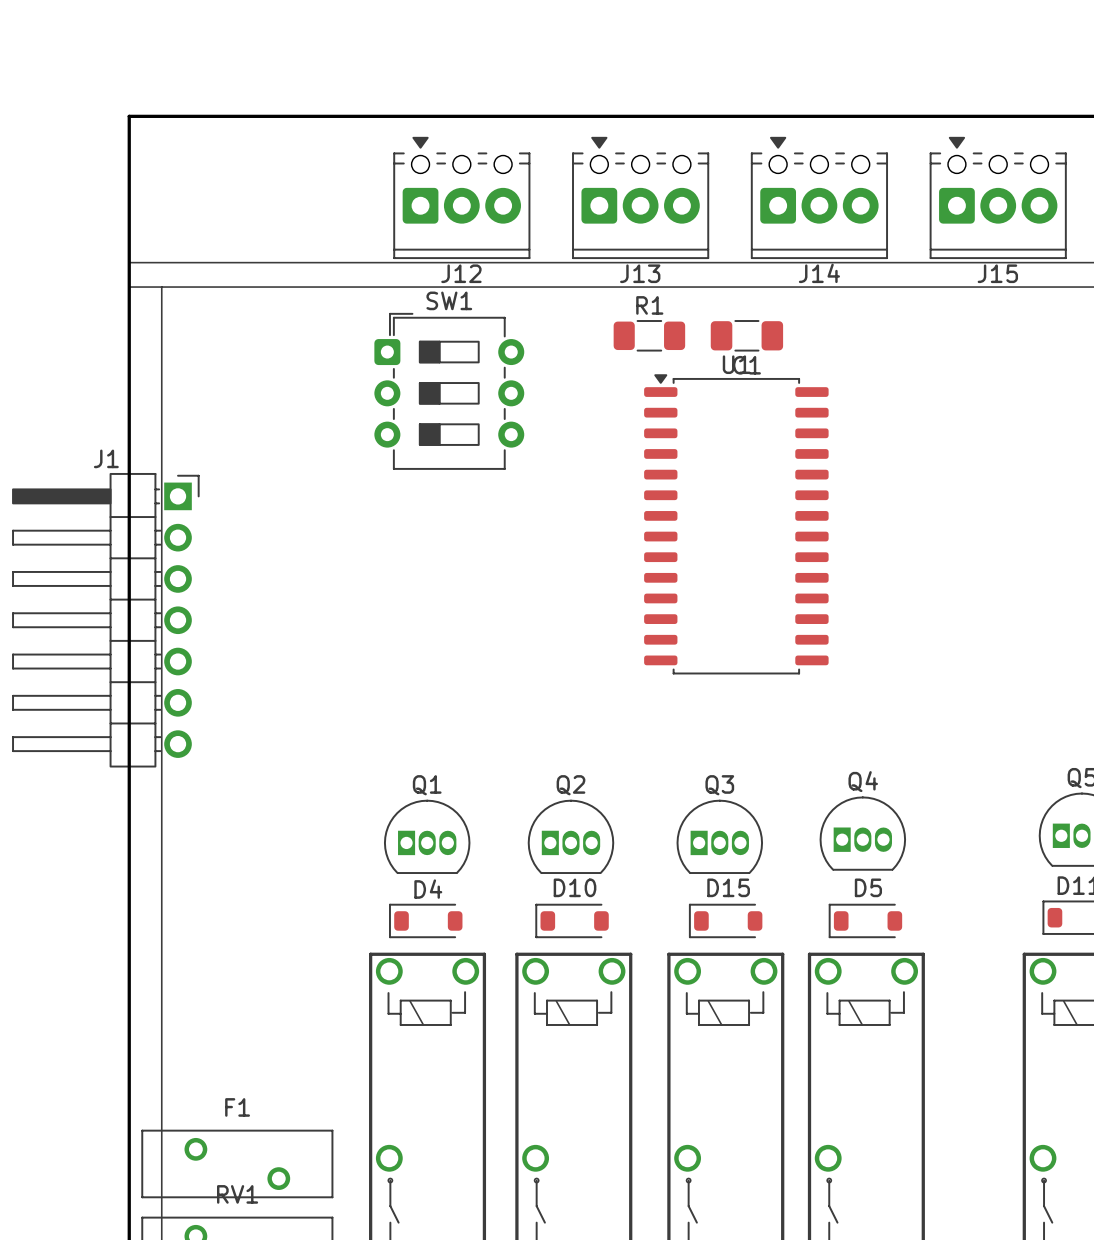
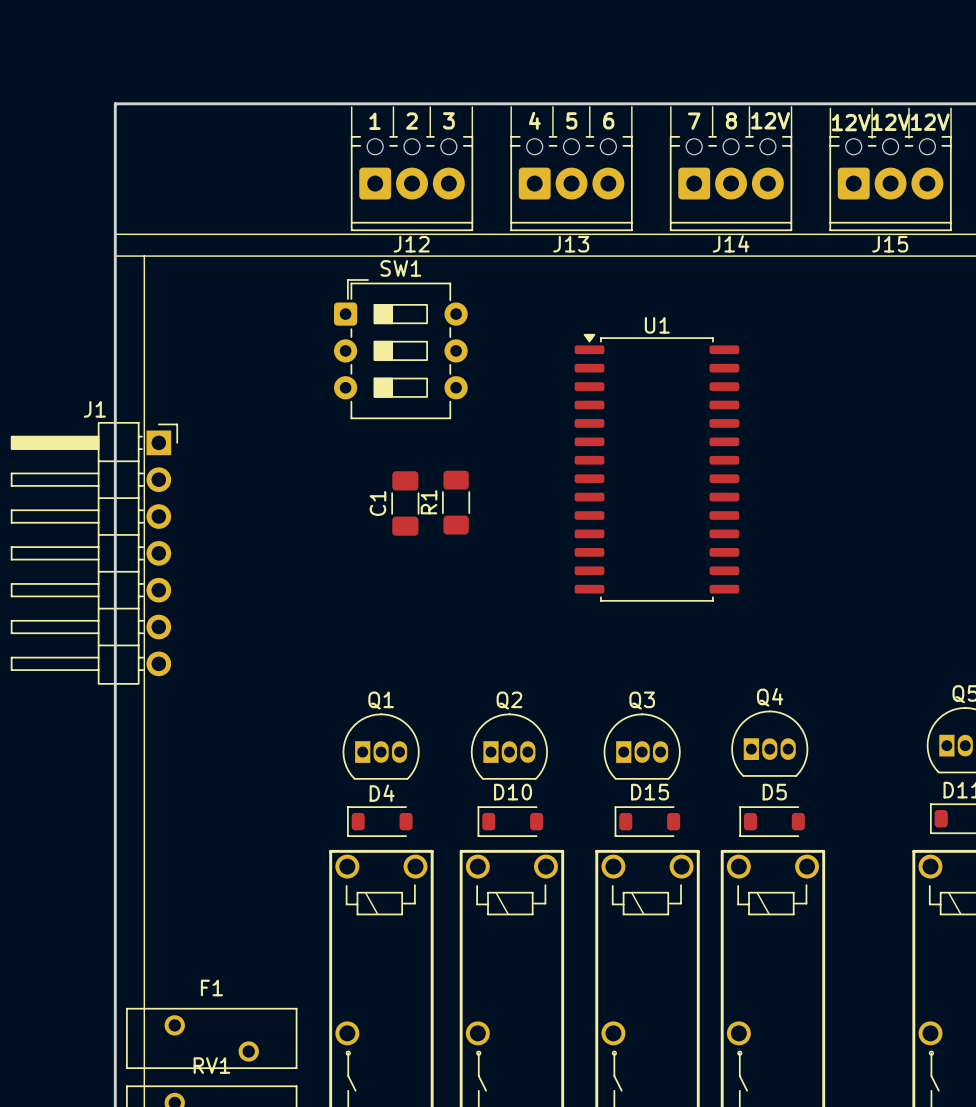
J12 footprint: [393, 136, 531, 260] -> [350, 106, 474, 232]
J13 footprint: [572, 136, 710, 260] -> [510, 106, 633, 232]
J14 footprint: [750, 136, 889, 260] -> [669, 106, 793, 232]
J15 footprint: [929, 136, 1067, 260] -> [829, 107, 952, 232]
R1 name position: R1 (649, 305) -> R1 (429, 502)
R1 rotation: 0° (649, 335) -> 90° clockwise (456, 502)
R1 position: (649, 335) -> (456, 502)
C1 rotation: 0° (746, 335) -> 90° clockwise (405, 503)
C1 position: (746, 335) -> (405, 503)

